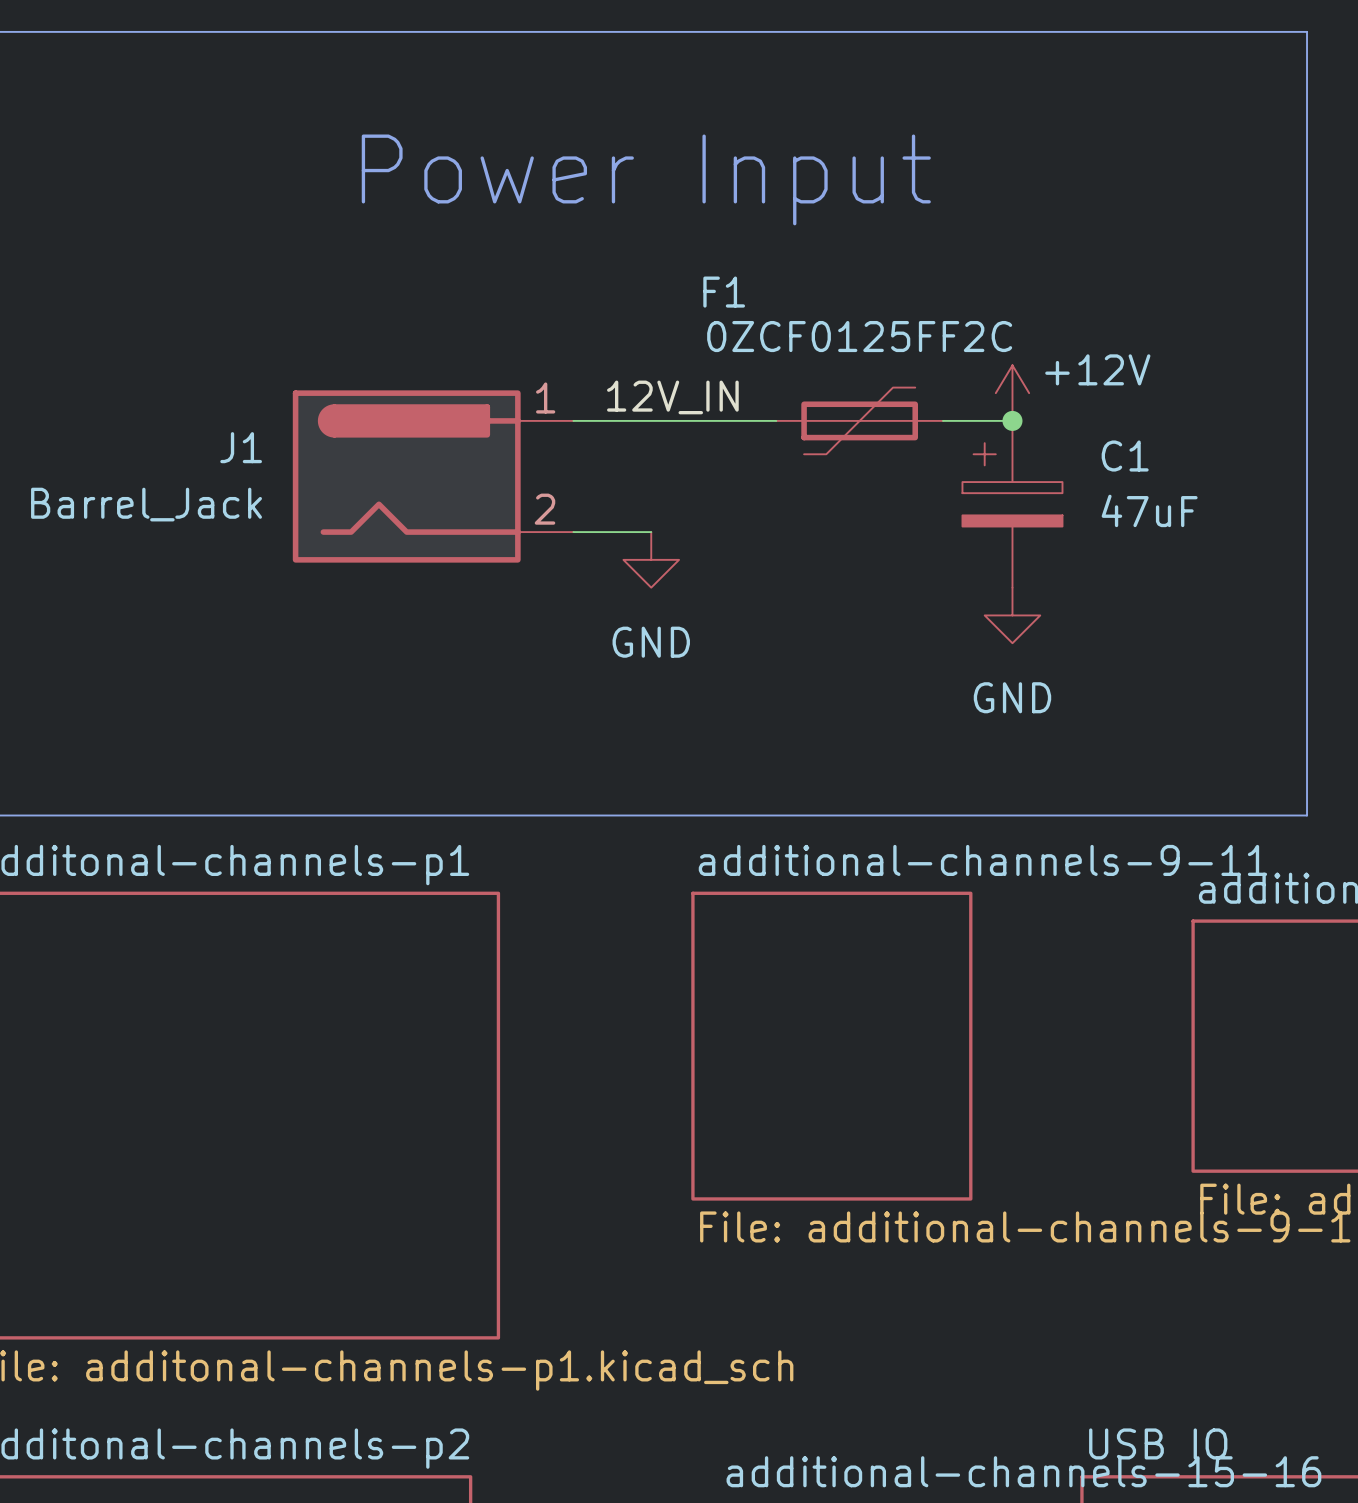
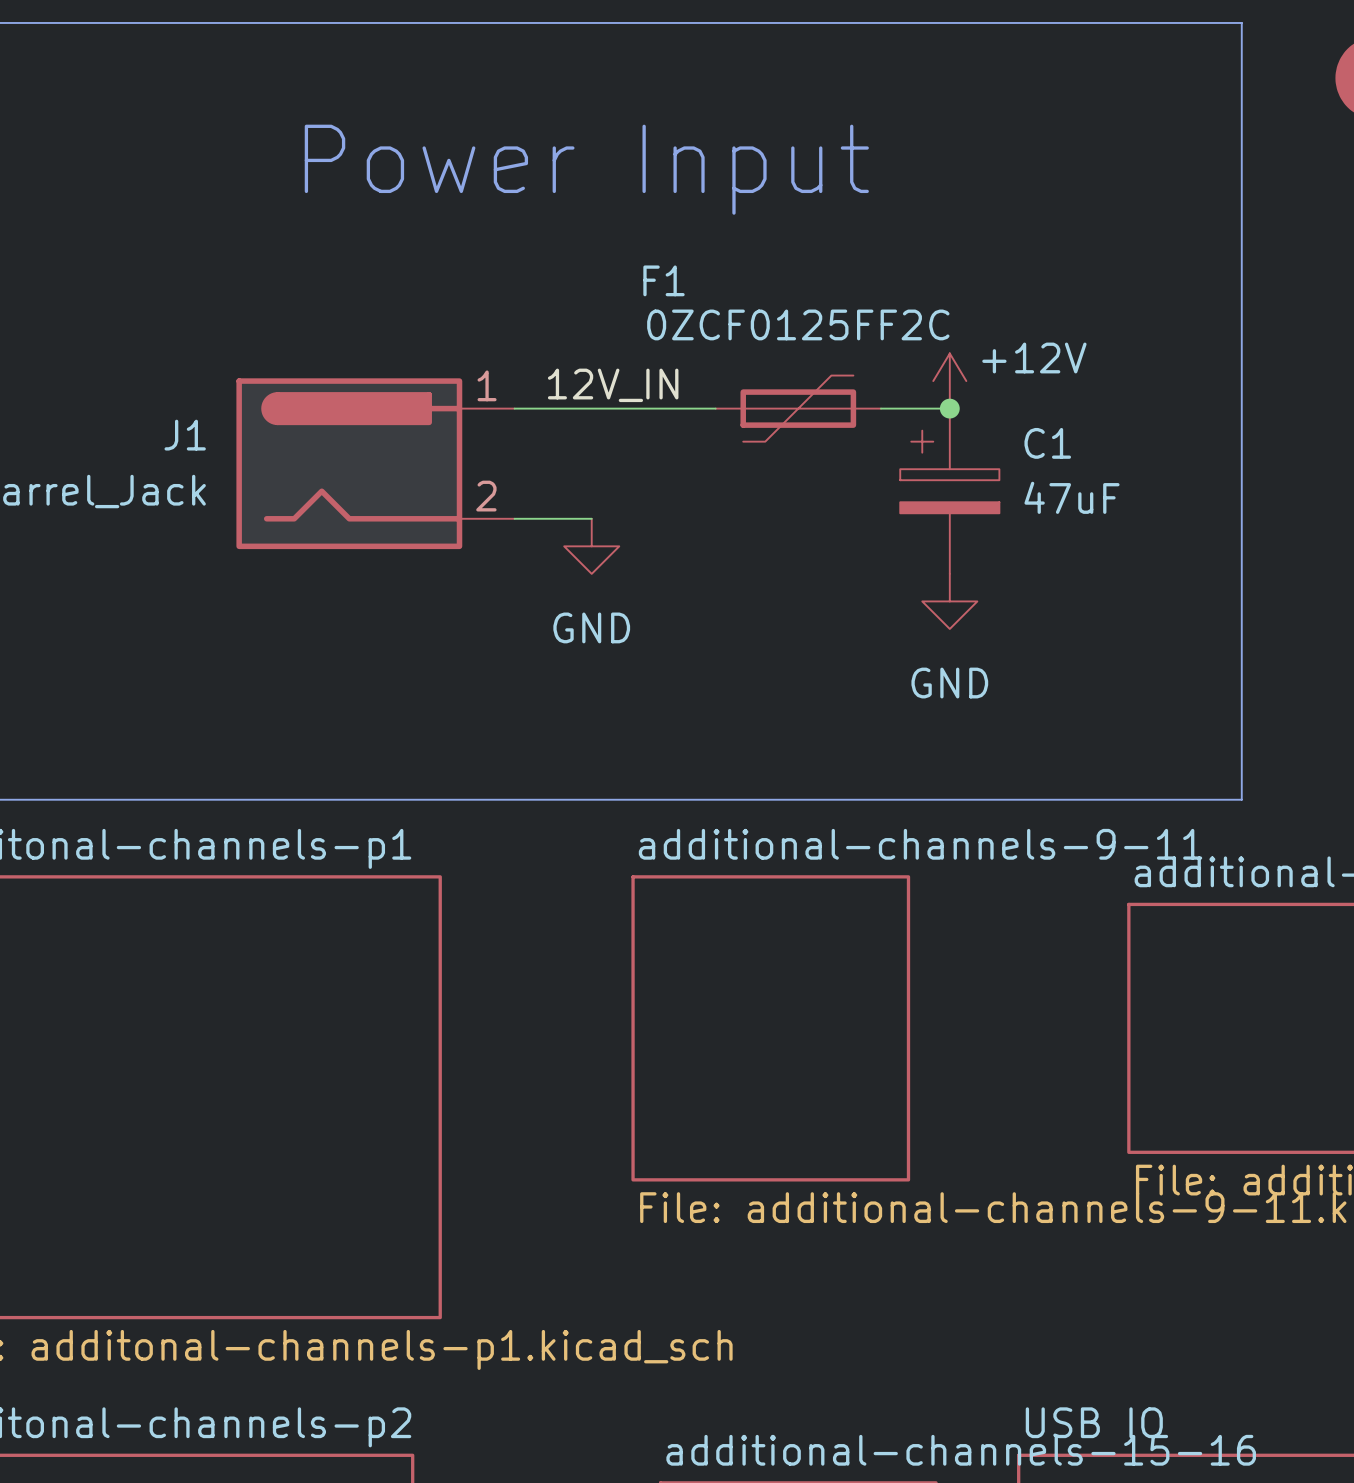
C1 name position: C1 (1125, 456) -> C1 (1047, 443)
C1 value position: 47uF (1149, 510) -> 47uF (1072, 497)

